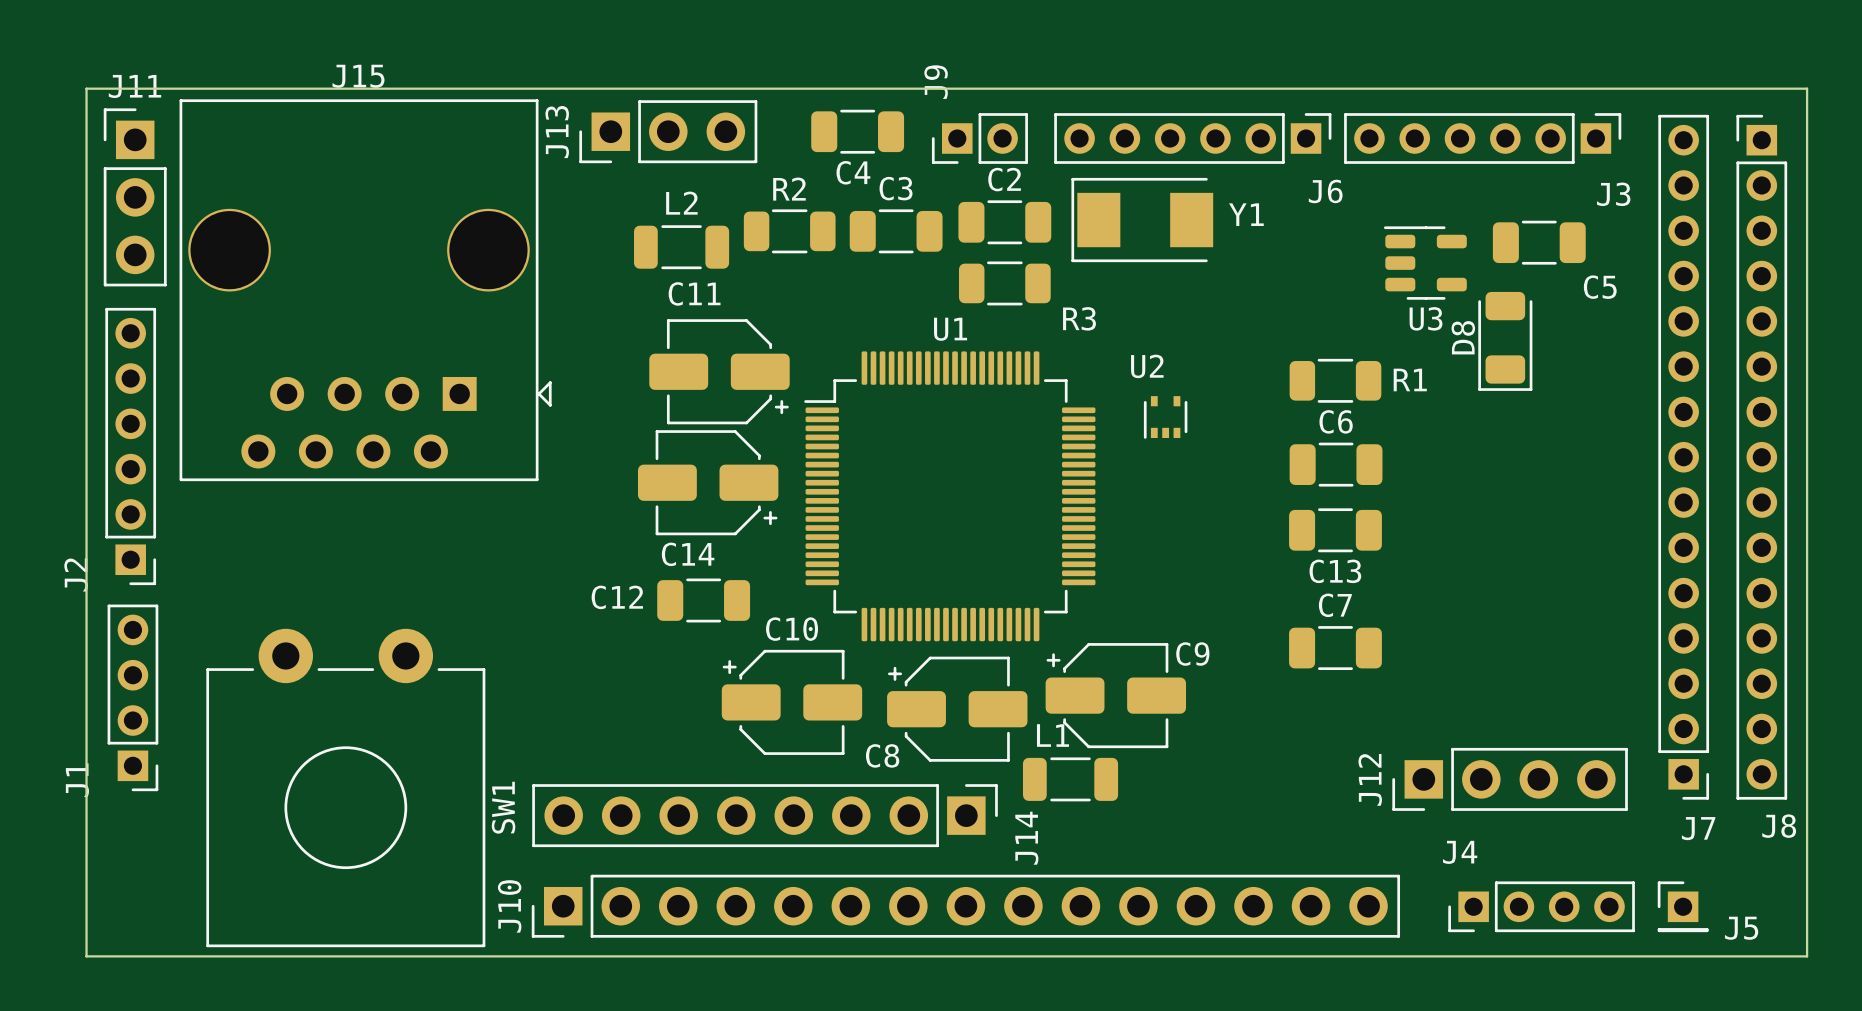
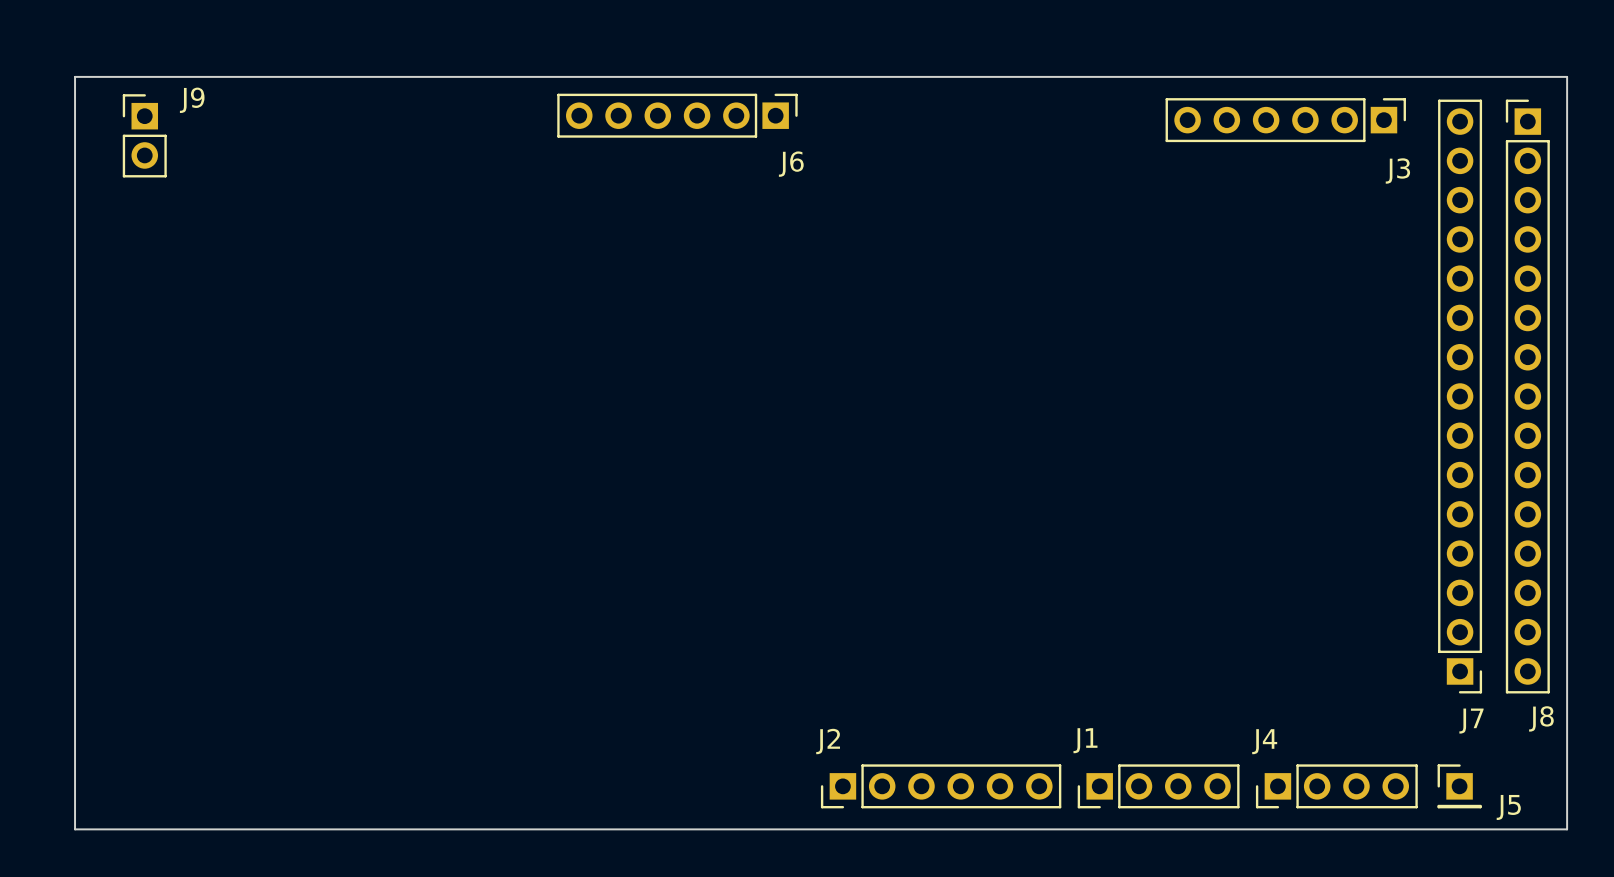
J13: (668, 131) -> none
C4: (857, 131) -> none
J9 rotation: 0° (979, 138) -> 90° clockwise (144, 135)
J9 position: (979, 138) -> (144, 135)
J6 position: (1192, 138) -> (677, 115)
J11: (135, 197) -> none
Y1: (1142, 220) -> none
C2: (1004, 222) -> none
R2: (789, 231) -> none
C3: (896, 231) -> none
C5: (1539, 242) -> none
L2: (681, 247) -> none
U3: (1425, 263) -> none
R3: (1004, 283) -> none
J15: (365, 290) -> none
D8: (1505, 341) -> none
C11: (719, 371) -> none
R1: (1335, 380) -> none
U2: (1165, 417) -> none
J2 rotation: 0° (130, 446) -> 90° clockwise (941, 786)
J2 position: (130, 446) -> (941, 786)
C6: (1336, 464) -> none
C14: (708, 482) -> none
U1: (949, 496) -> none
C13: (1335, 530) -> none
C12: (703, 600) -> none
C7: (1335, 648) -> none
C9: (1115, 695) -> none
J1 rotation: 0° (132, 697) -> 90° clockwise (1158, 786)
J1 position: (132, 697) -> (1158, 786)
C10: (791, 702) -> none
C8: (957, 709) -> none
L1: (1070, 779) -> none
J12: (1510, 779) -> none
SW1: (345, 788) -> none
J14: (765, 815) -> none
J10: (965, 906) -> none

